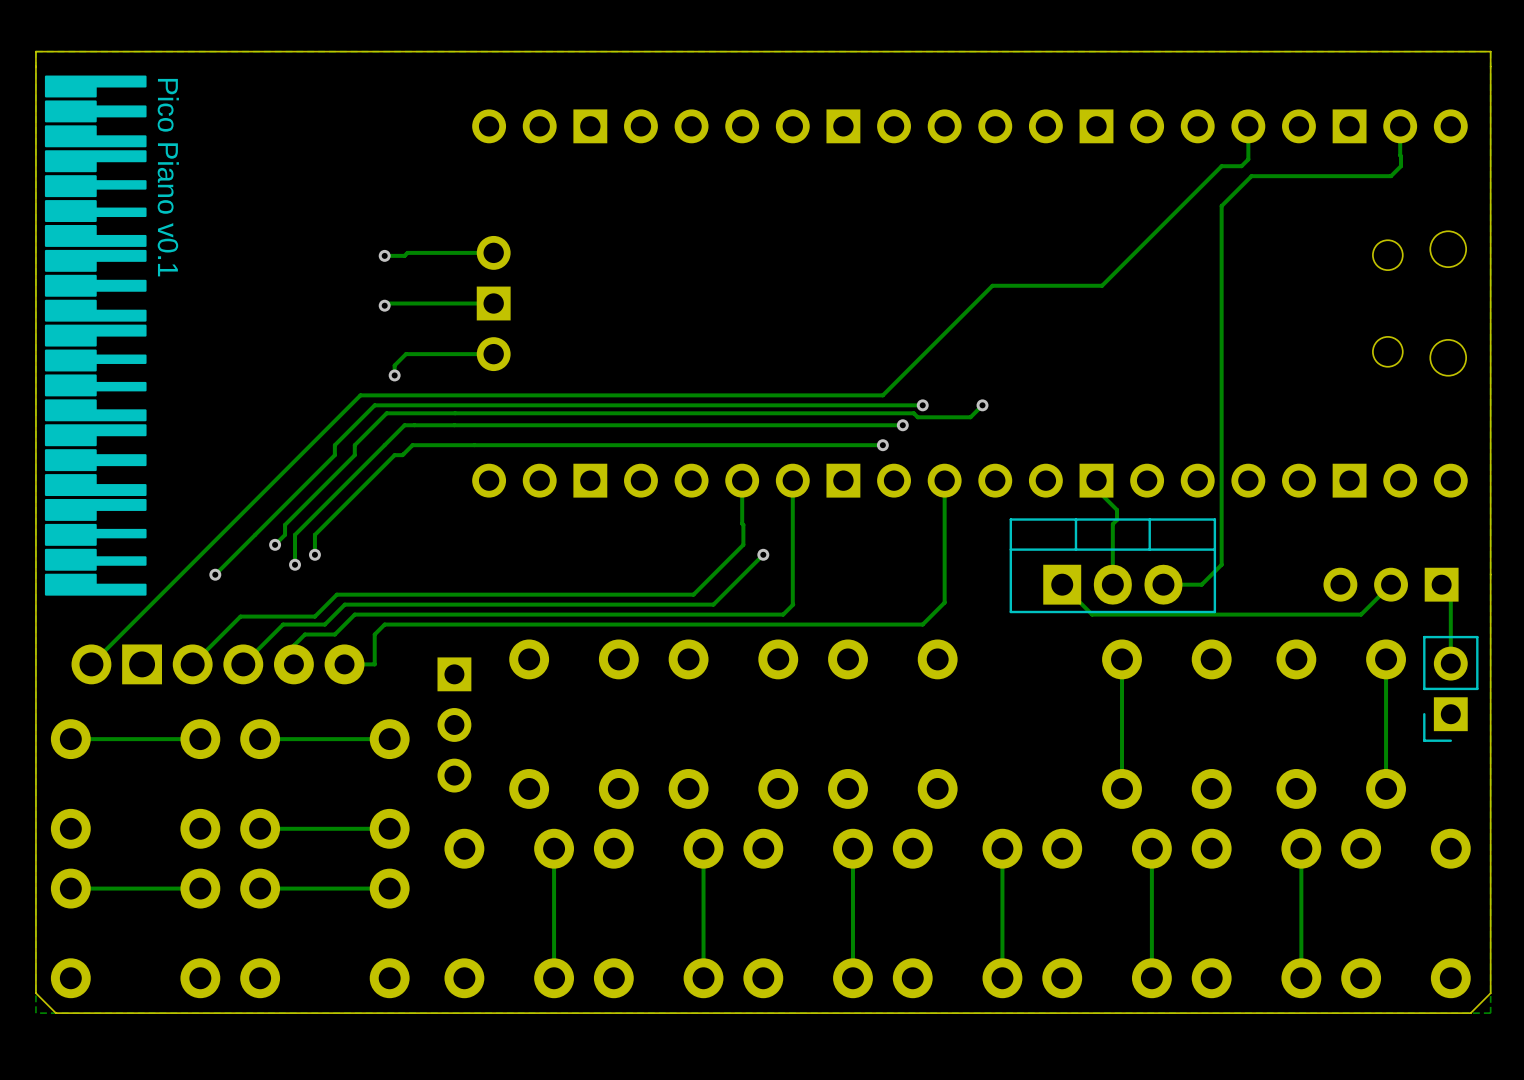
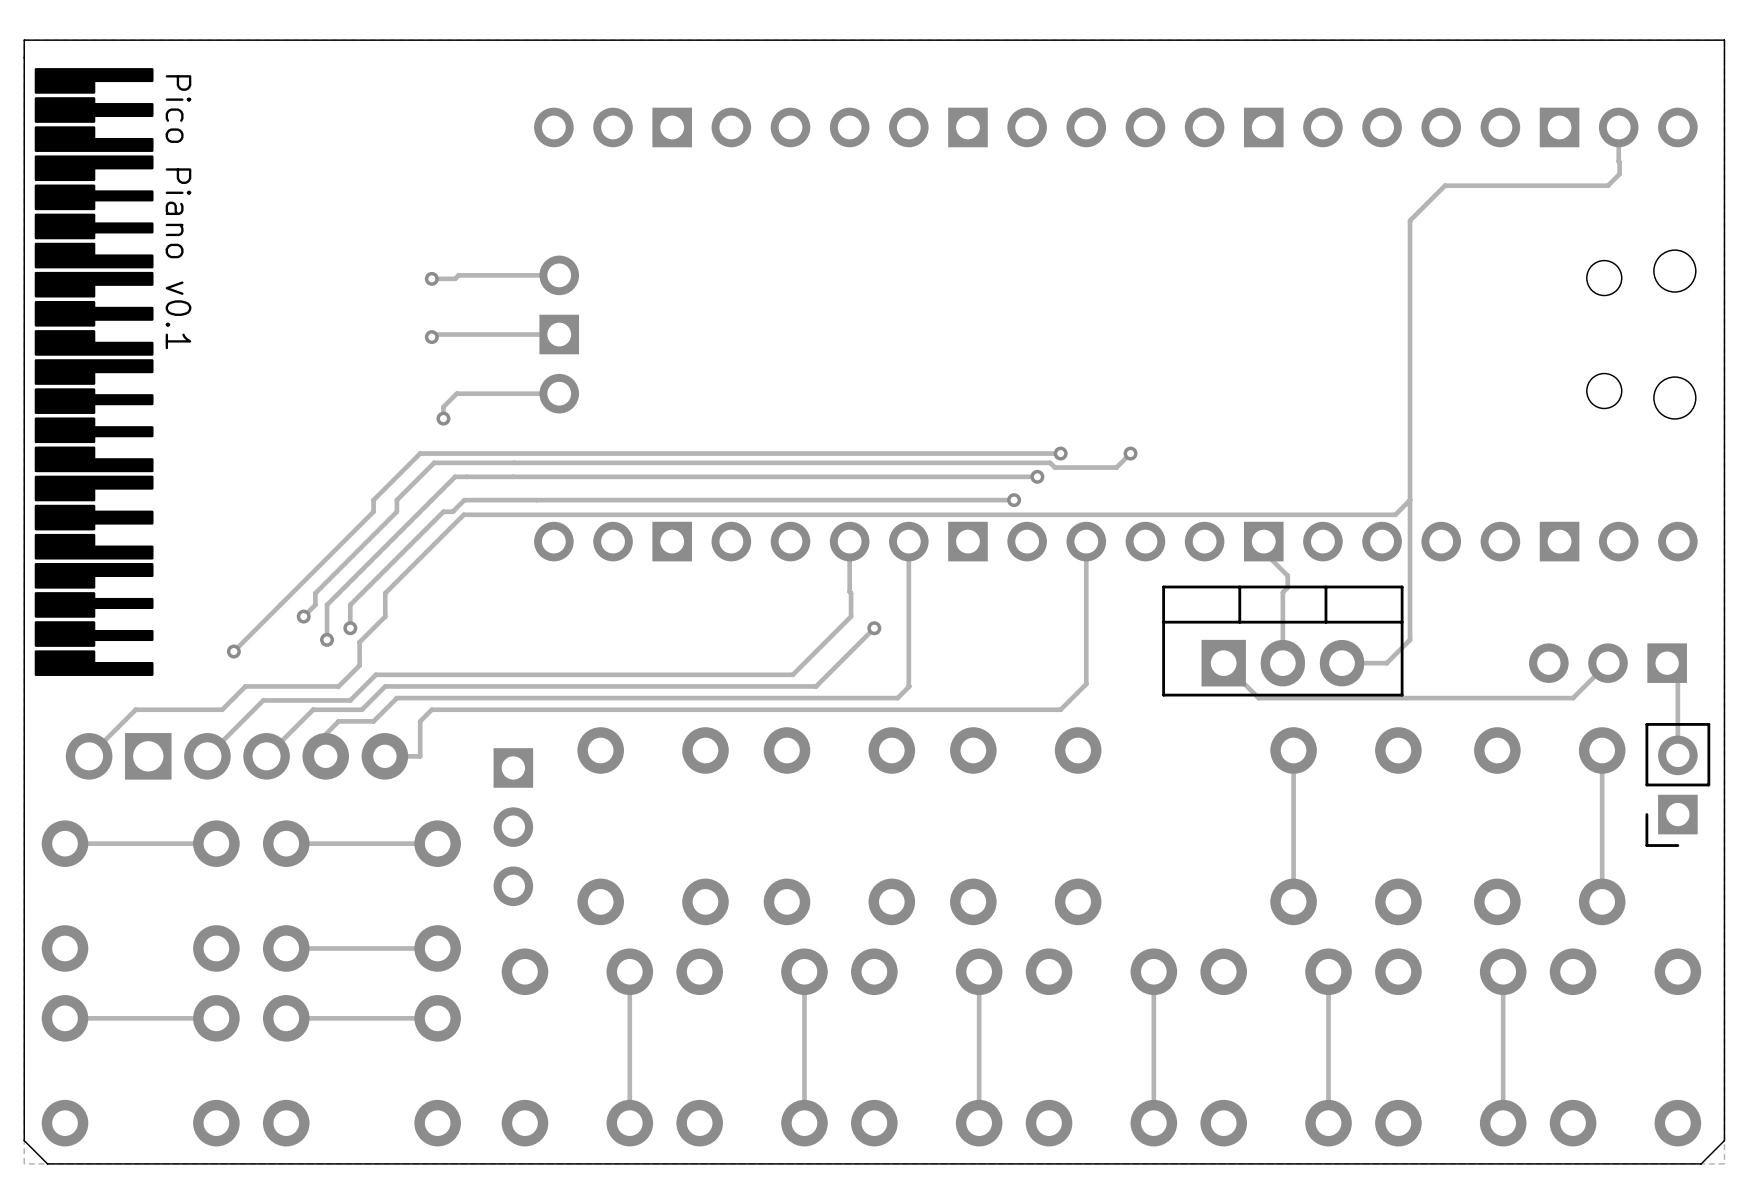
track: (1248, 126) (1248, 159) (1241, 166) (1221, 166) (1102, 285) (992, 285) (882, 395) (360, 395) (131, 624) -> (1410, 500) (1395, 514) (463, 514) (385, 593) (385, 616) (359, 642) (359, 665) (338, 686) (245, 686) (222, 709) (135, 709)

